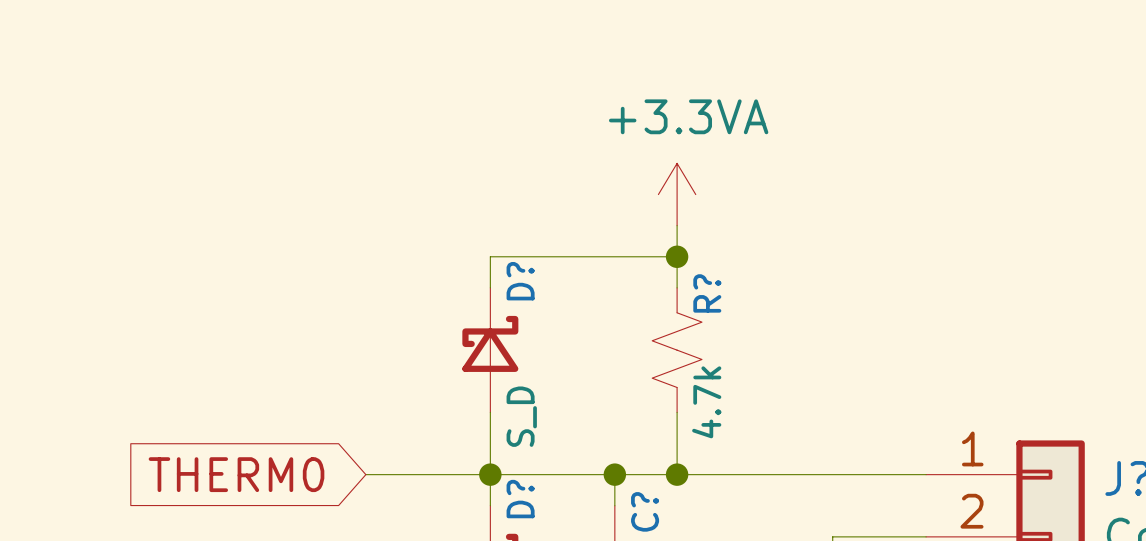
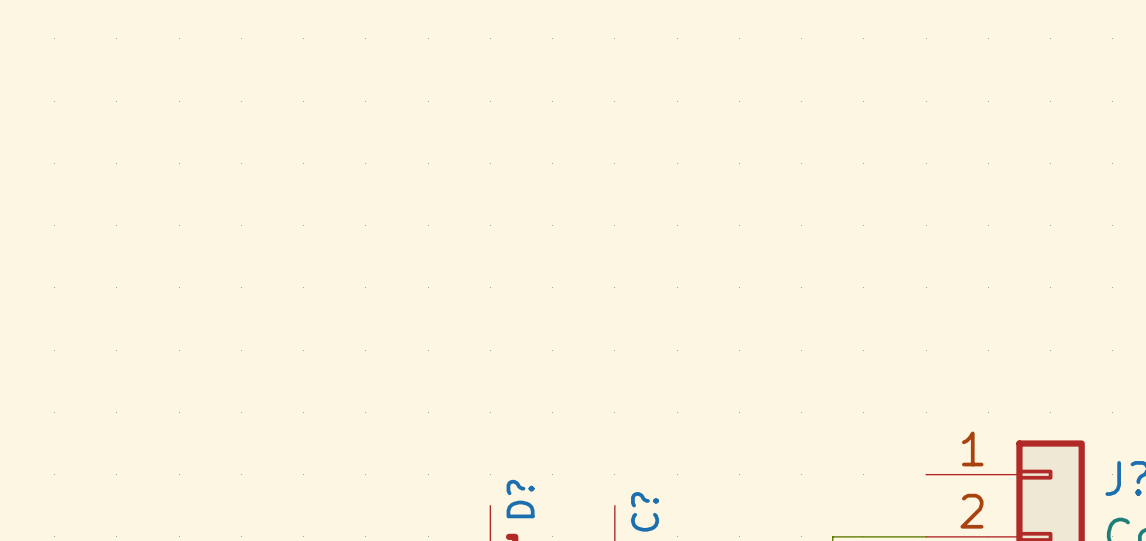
power symbol: +3.3VA (677, 194) -> none
wire: (677, 225) (677, 287) -> none
wire: (677, 256) (490, 256) (490, 287) -> none
junction: (677, 256) -> none
D?: S_D (490, 350) -> none
R?: 4.7k (677, 350) -> none
wire: (490, 412) (490, 505) -> none
wire: (677, 412) (677, 474) -> none
global label: THERM0 (236, 474) -> none
wire: (365, 474) (926, 474) -> none
junction: (490, 474) -> none
wire: (614, 474) (614, 505) -> none
junction: (614, 474) -> none
junction: (677, 474) -> none

